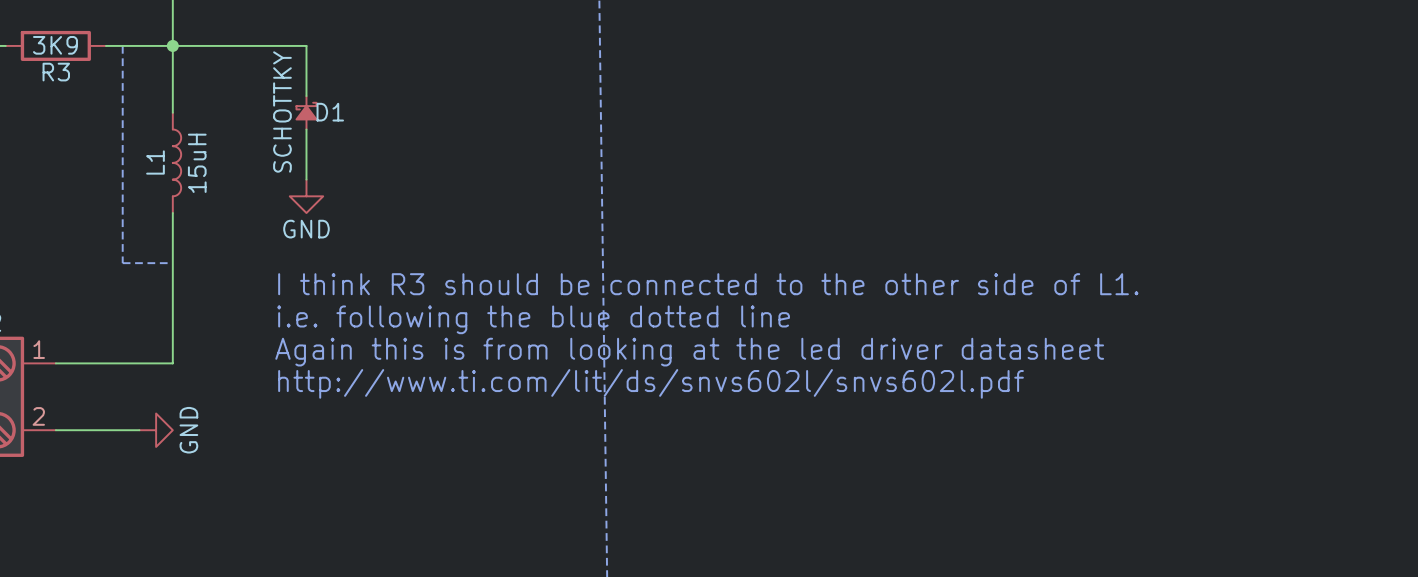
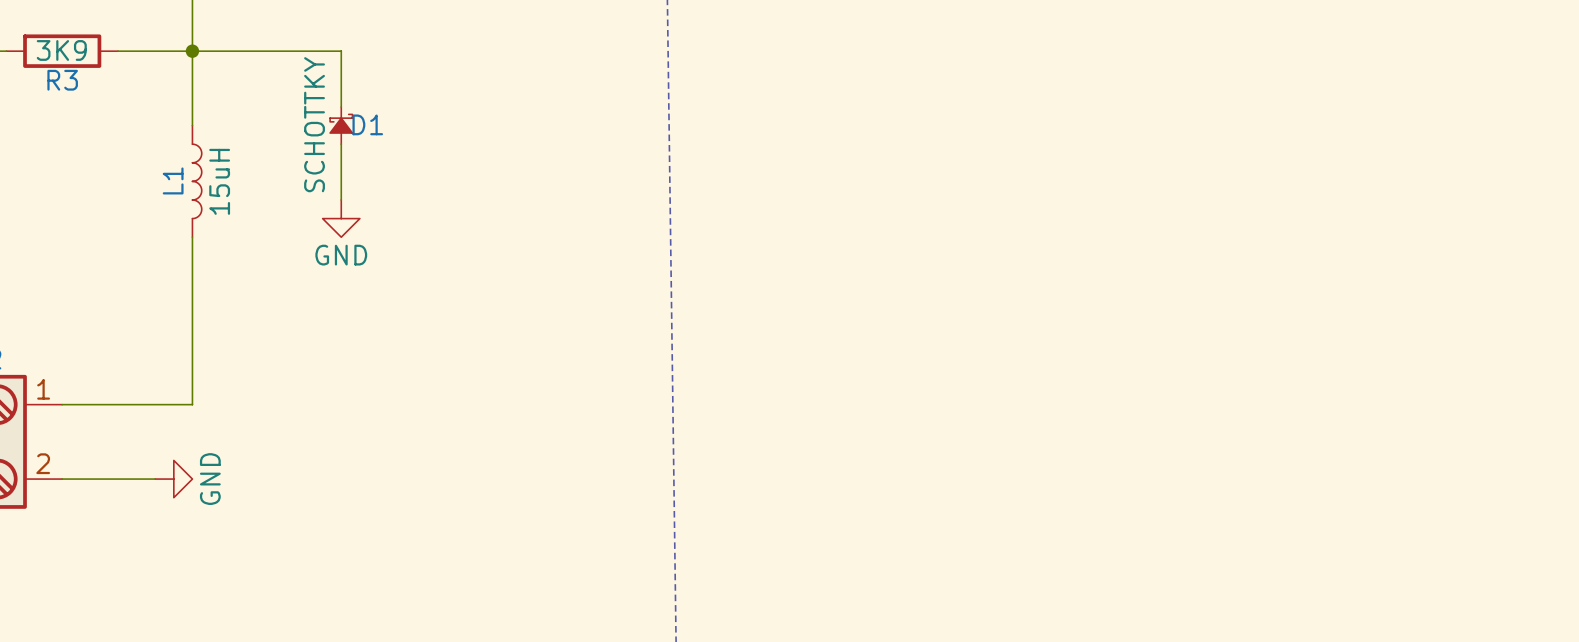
line: (122, 45) (122, 263) (172, 263) -> none
text: I think R3 should be connected to the other side of L1. (708, 284) -> none
text: i.e. following the blue dotted line (533, 319) -> none
text: Again this is from looking at the led driver datasheet (689, 352) -> none
text: http://www.ti.com/lit/ds/snvs602l/snvs602l.pdf (651, 383) -> none

